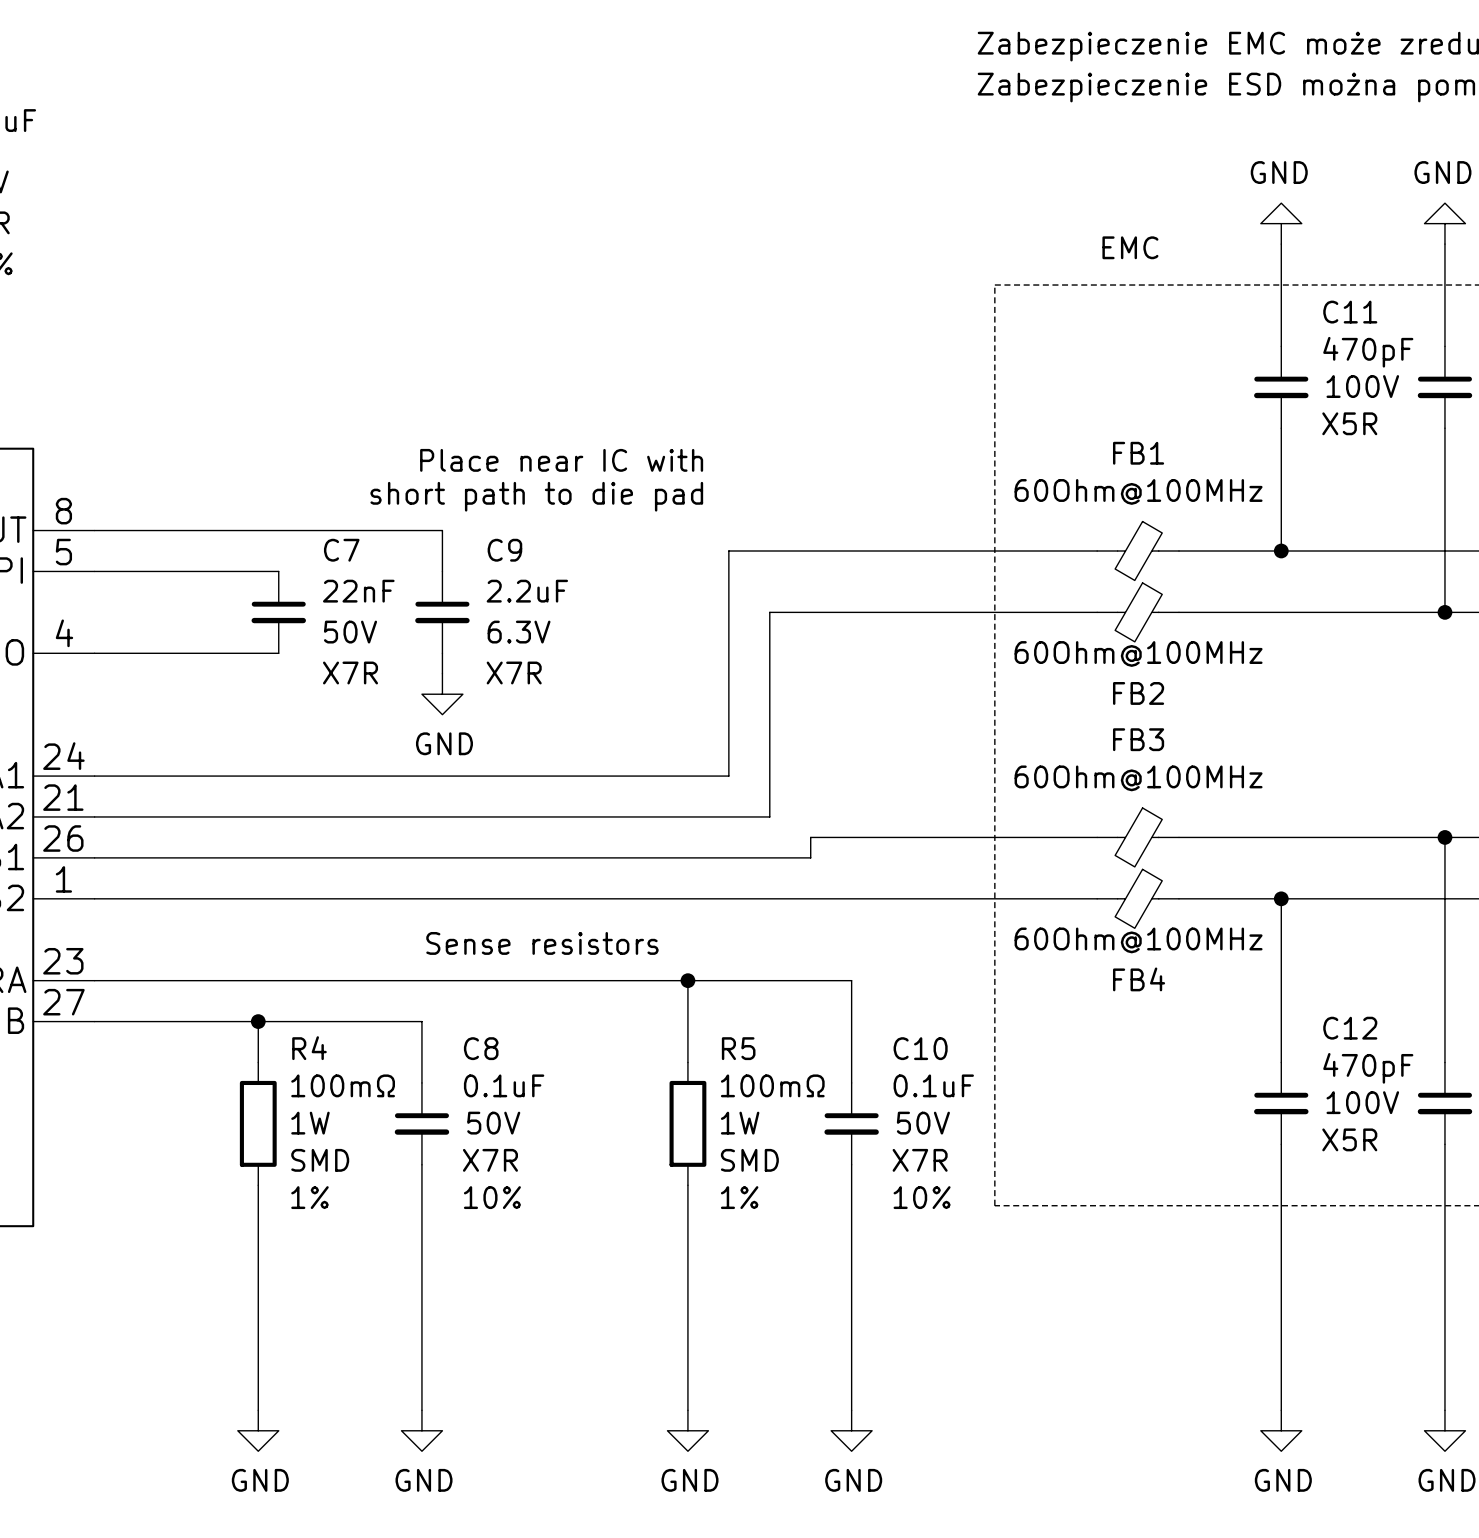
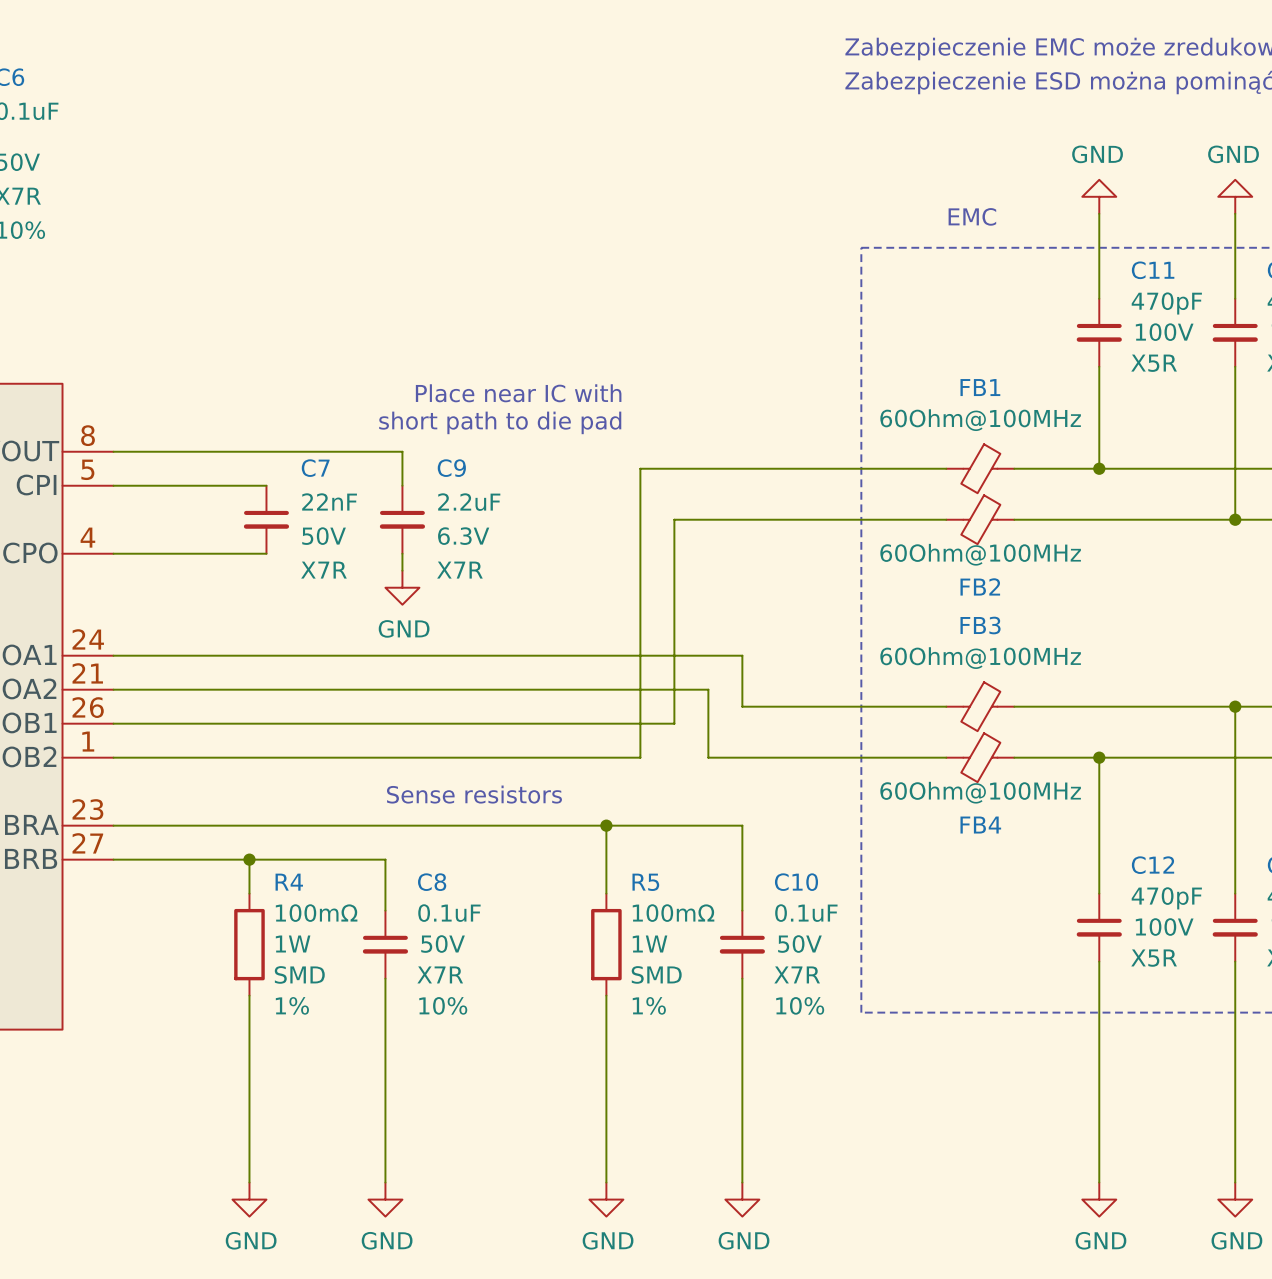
wire: (810, 837) (851, 837) -> none
wire: (769, 857) (810, 857) -> (674, 723) (674, 689) (708, 689) (708, 706)
wire: none -> (708, 723) (708, 757)
wire: (728, 898) (810, 898) -> (640, 757) (640, 655) (742, 655) (742, 706)

